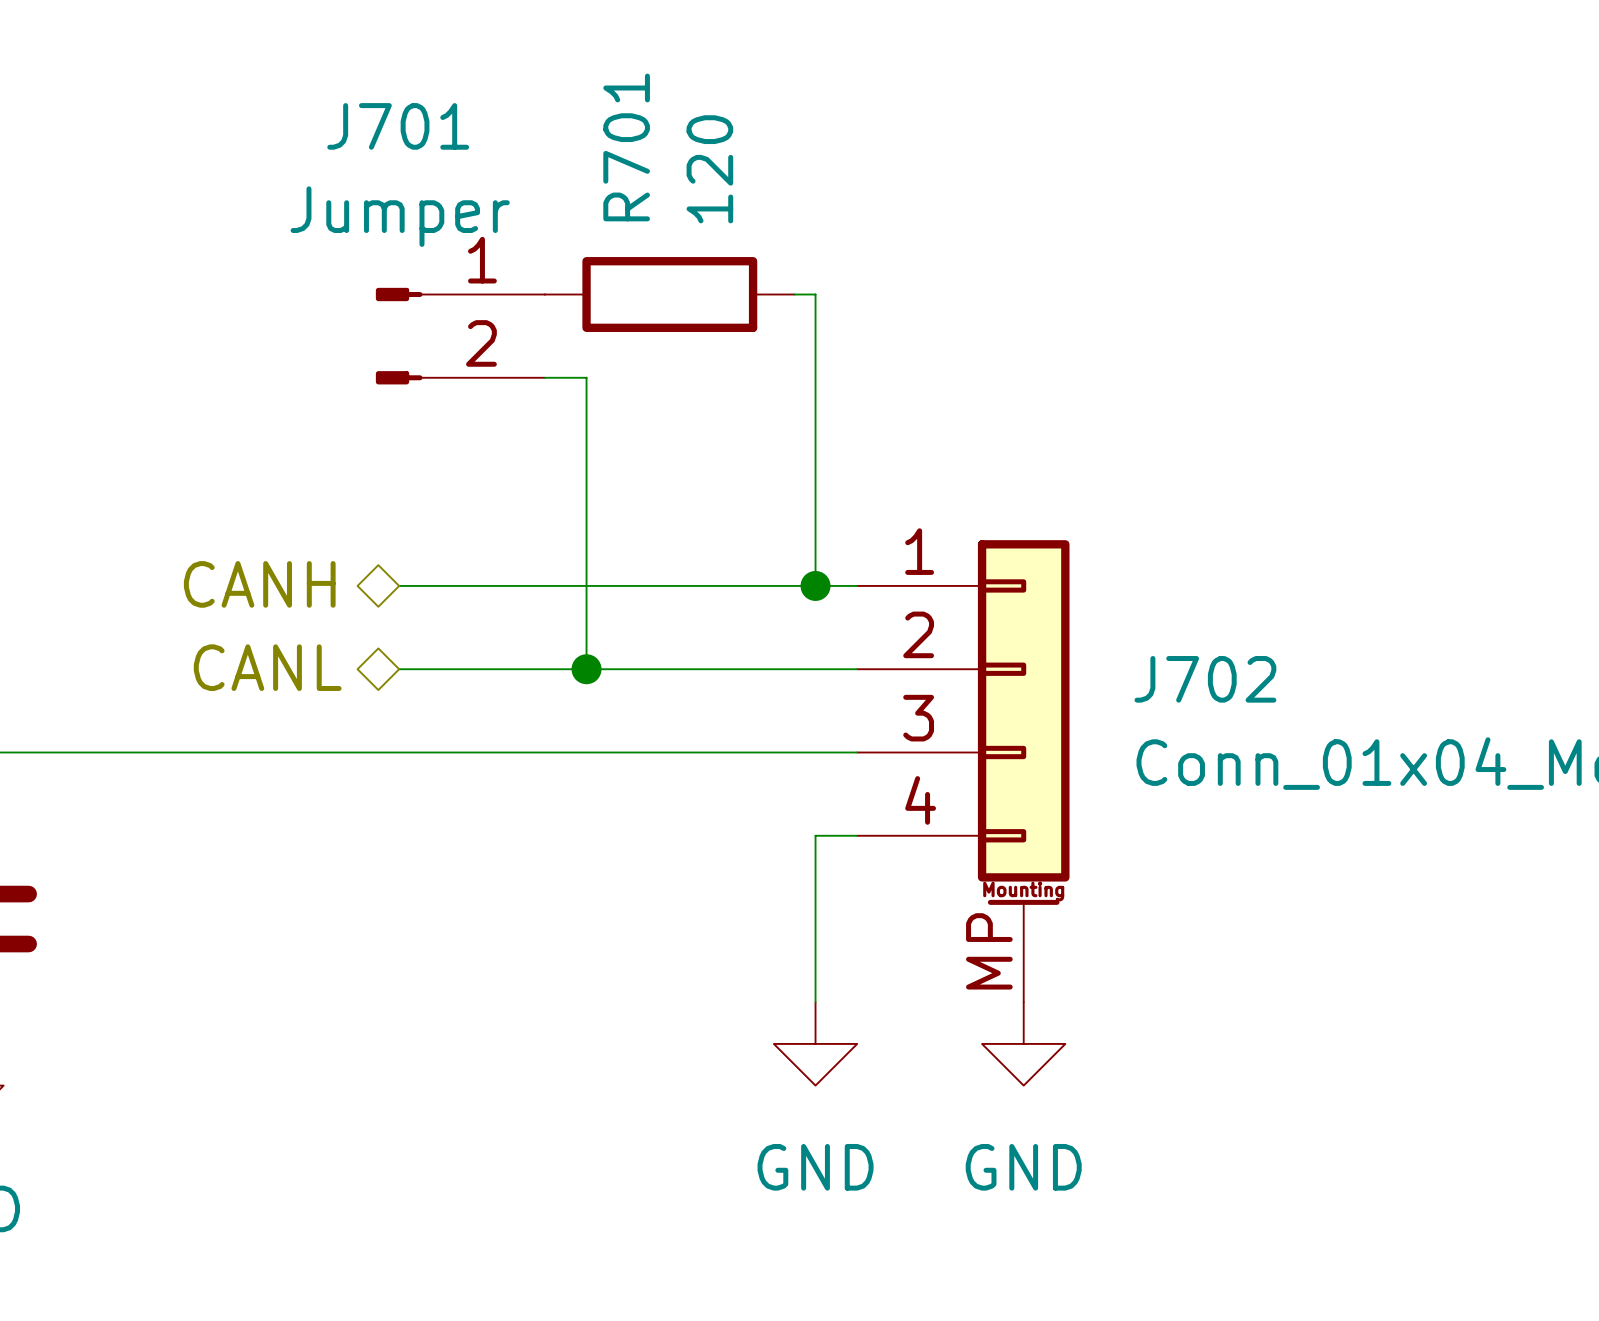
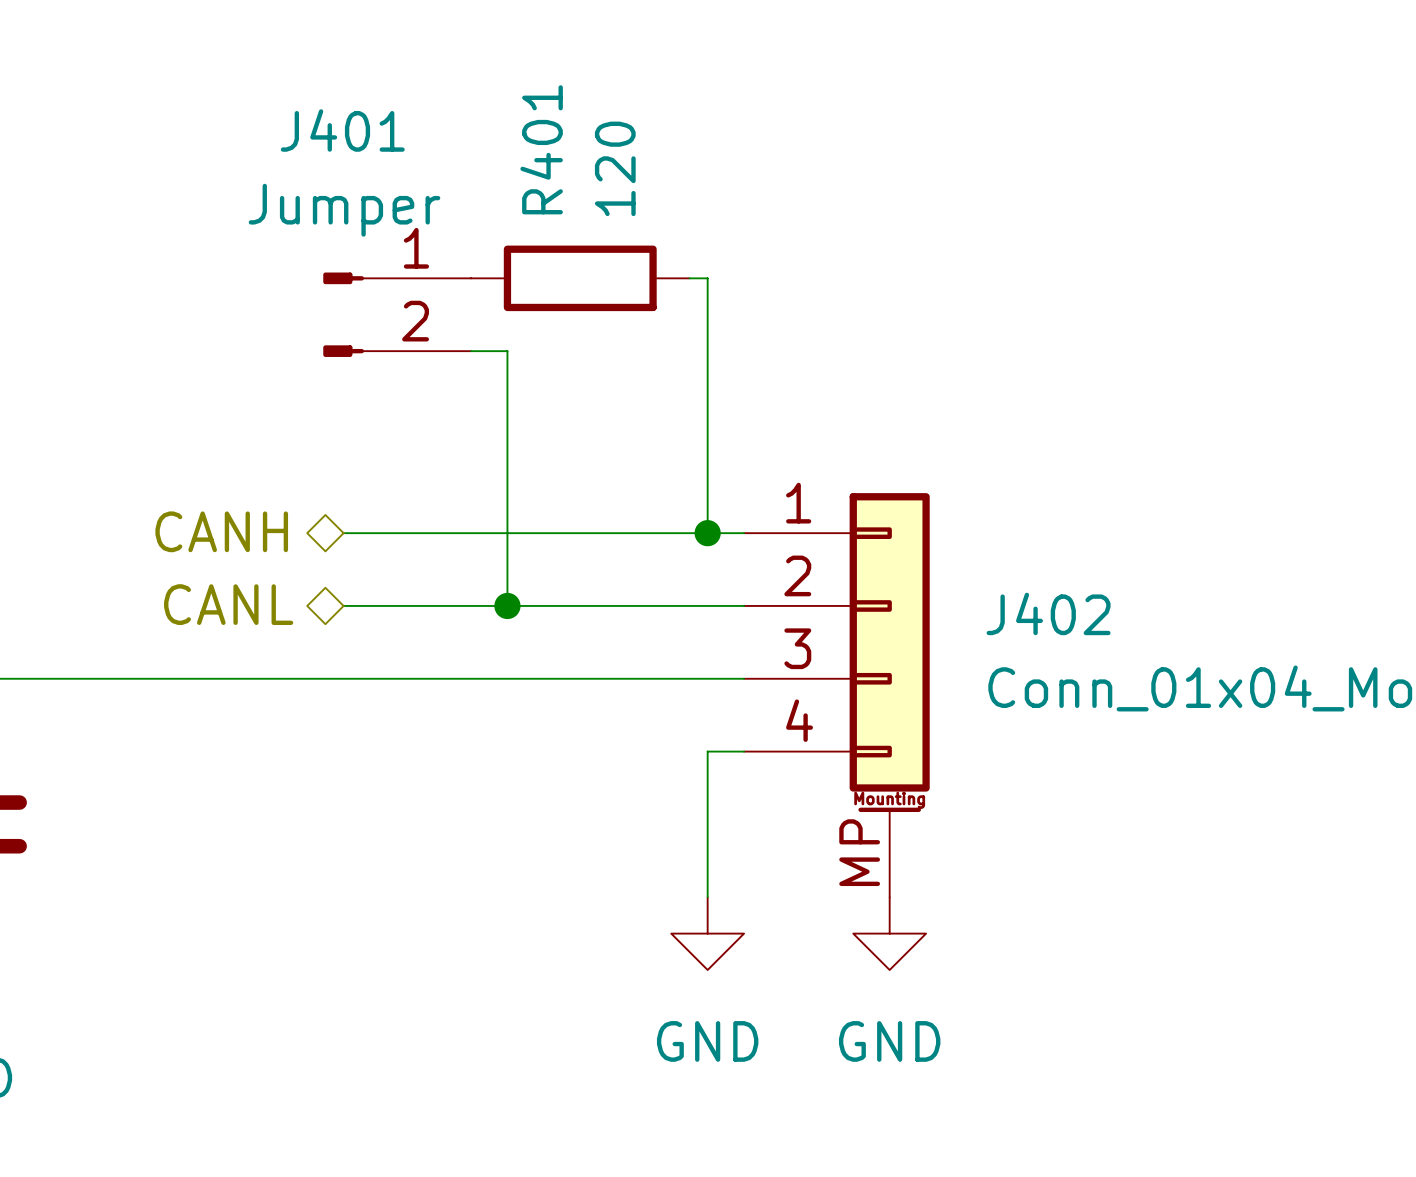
J701 name: J701 (398, 126) -> J401 (342, 130)
R701 name: R701 (626, 147) -> R401 (541, 149)
J702 name: J702 (1205, 679) -> J402 (1048, 613)

